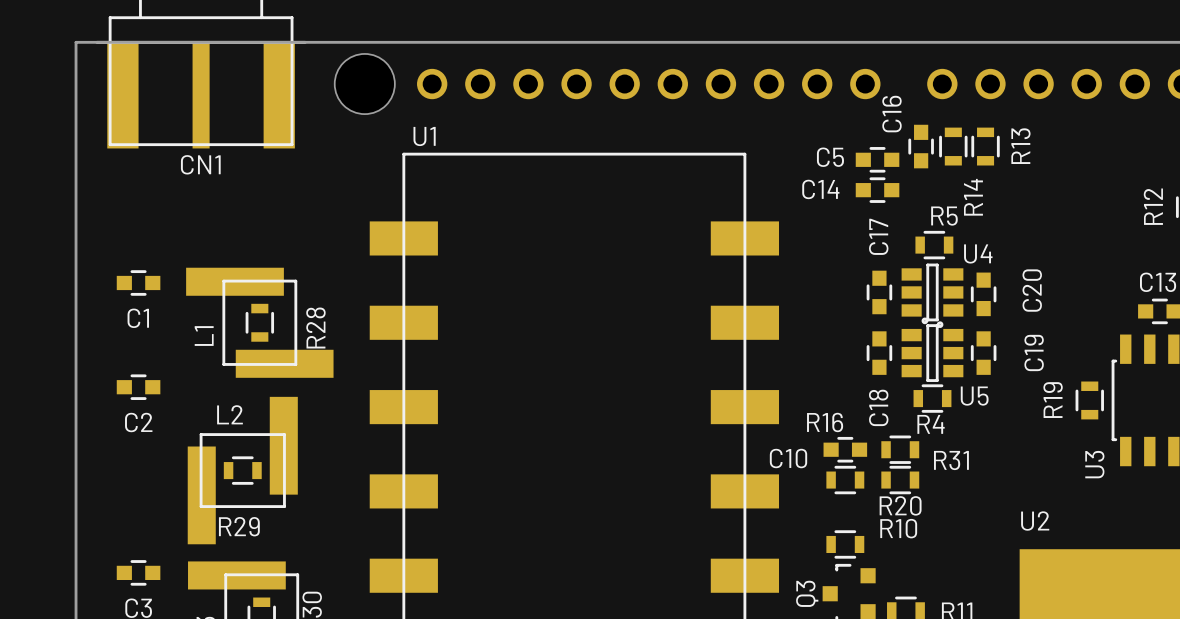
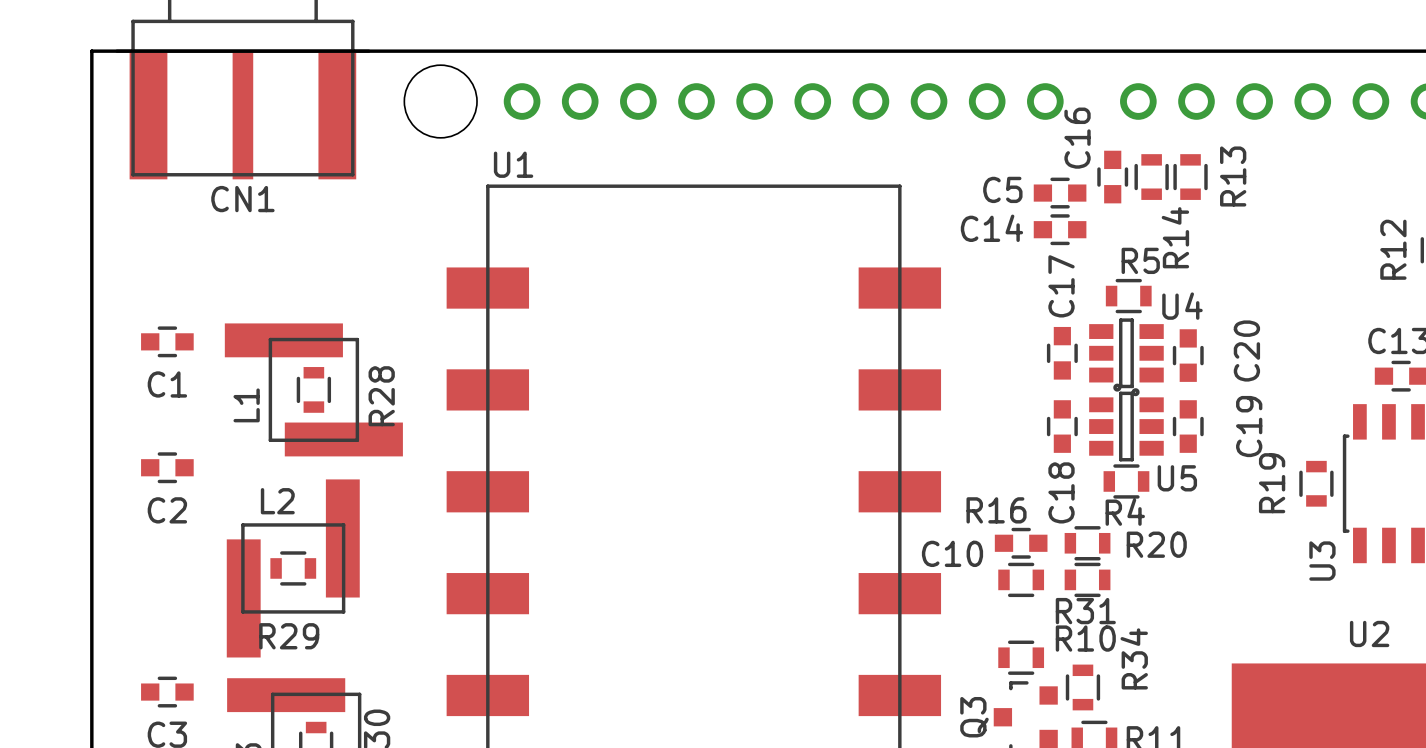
R31 name position: R31 (951, 460) -> R31 (1085, 611)
R20 name position: R20 (900, 505) -> R20 (1156, 544)
U2 name position: U2 (1035, 521) -> U2 (1369, 633)
R34: none -> (1082, 687)

